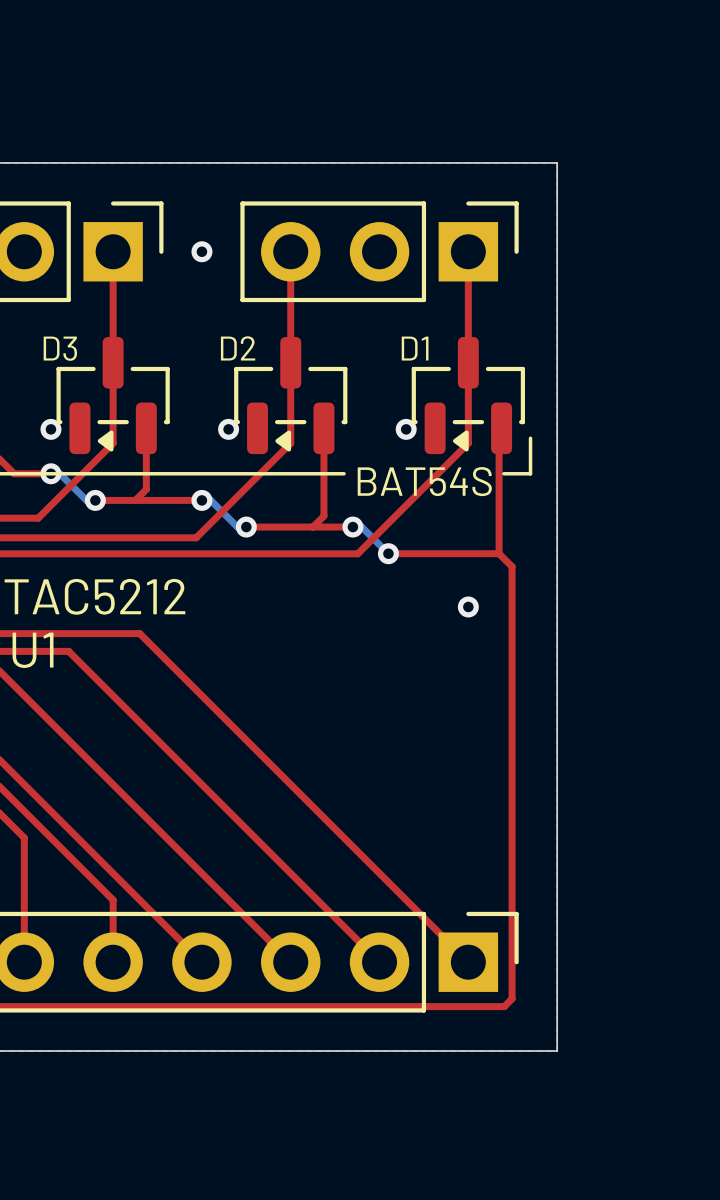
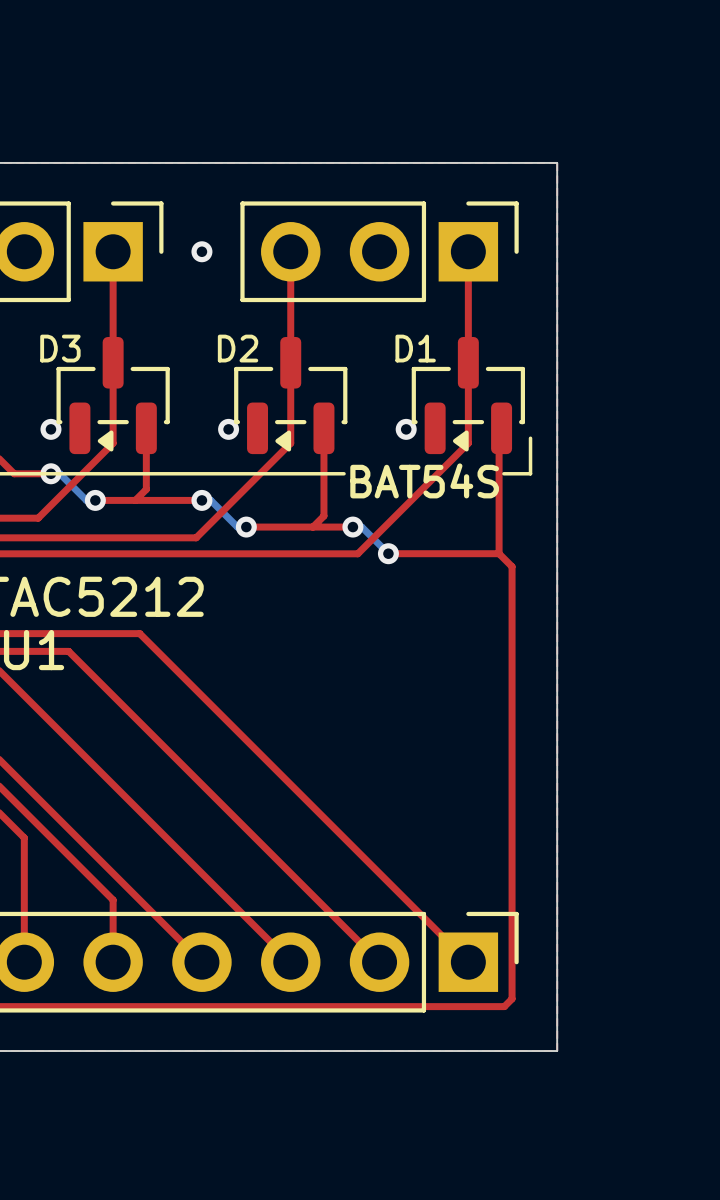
via: (468, 606) -> none

